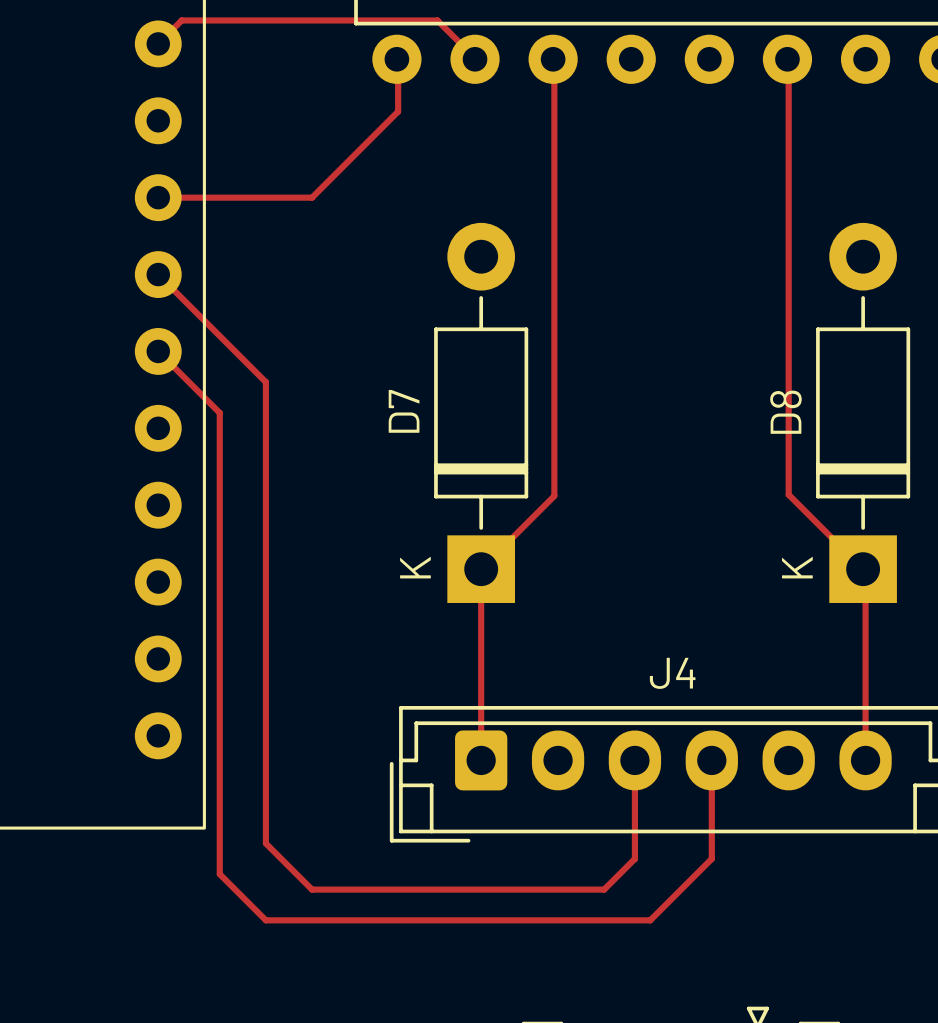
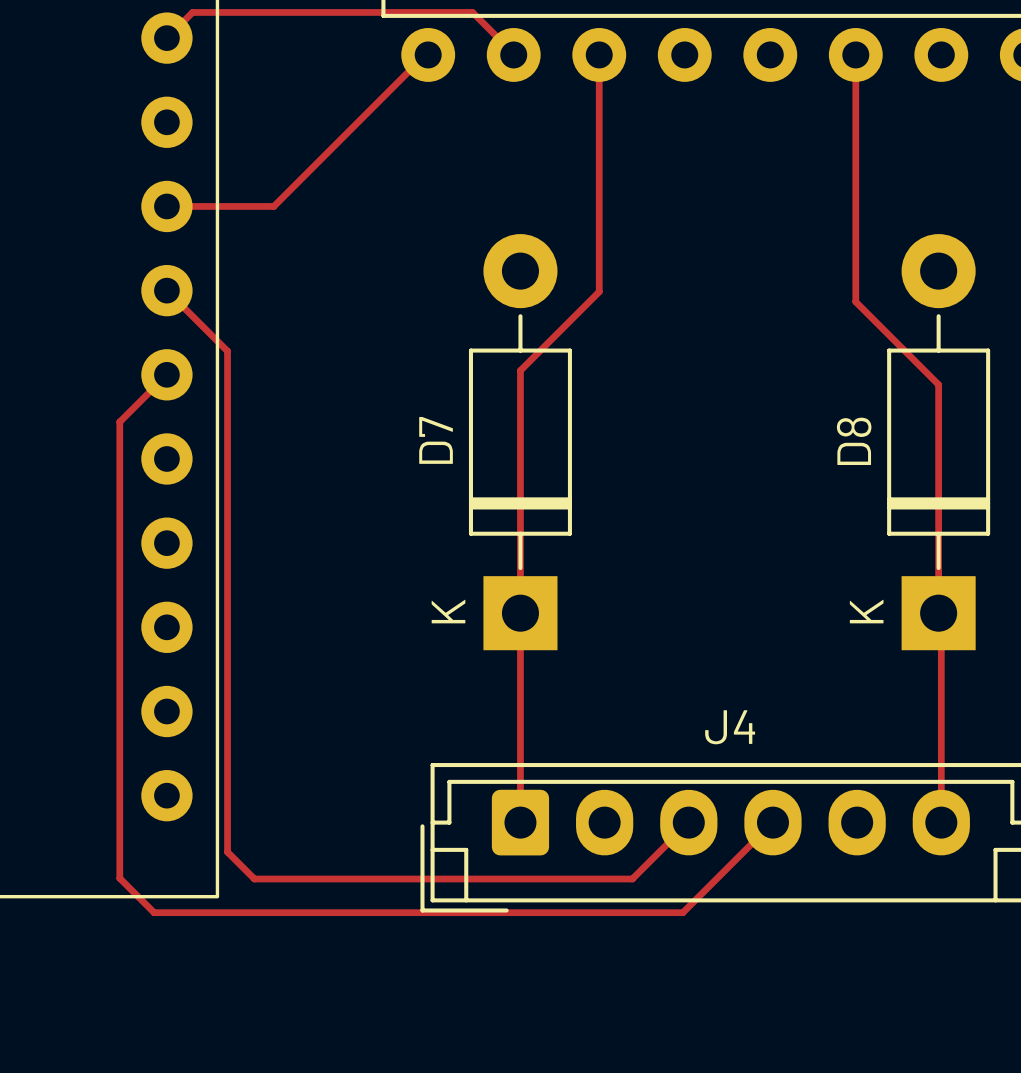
track: (398, 59) (398, 111) (312, 197) (255, 197) -> (429, 54) (425, 54) (273, 206)
track: (554, 74) (554, 495) (481, 569) -> (599, 54) (599, 291) (520, 370) (520, 613)
track: (788, 74) (788, 494) (863, 569) -> (855, 54) (855, 301) (938, 384) (938, 613)
track: (213, 329) (265, 382) (265, 843) (312, 889) (604, 889) (634, 858) (634, 778) -> (227, 351) (227, 852) (254, 879) (632, 879) (688, 822)
track: (158, 351) (219, 412) (219, 874) (265, 920) (650, 920) (711, 858) (711, 760) -> (166, 374) (119, 421) (119, 878) (154, 912) (682, 912) (772, 822) (755, 822)

